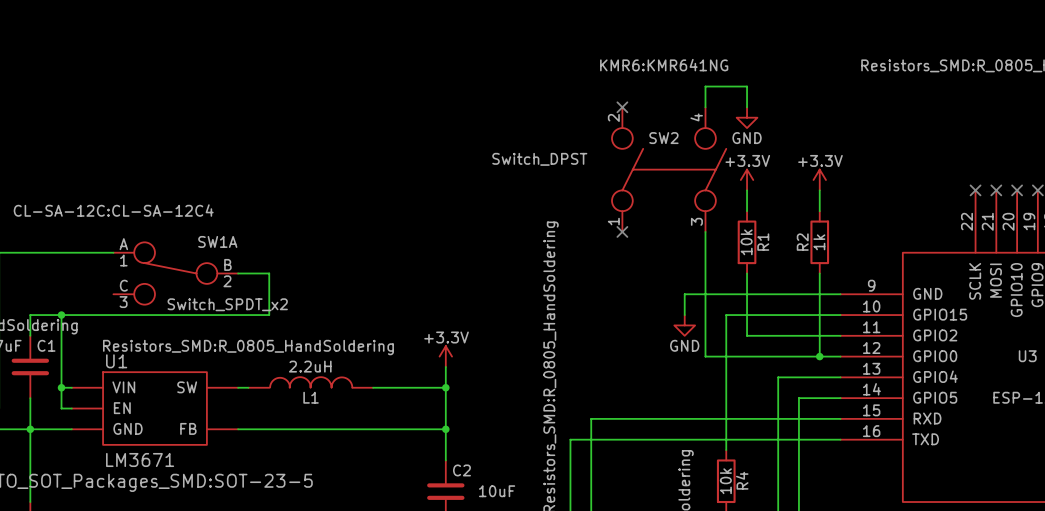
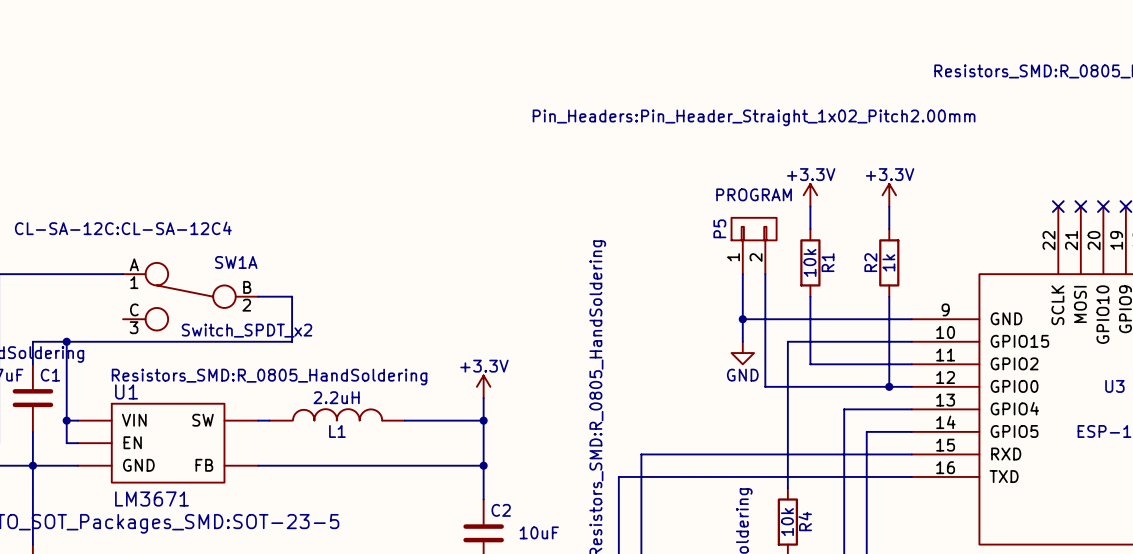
no-connect mark: (622, 107) -> none
wire: (705, 107) (705, 86) (747, 86) (747, 107) -> none
power symbol: GND (747, 117) -> none
SW2: Switch_DPST (669, 169) -> none
P5: none -> PROGRAM (754, 245)
no-connect mark: (622, 231) -> none
wire: none -> (742, 274) (742, 319)
junction: none -> (742, 319)

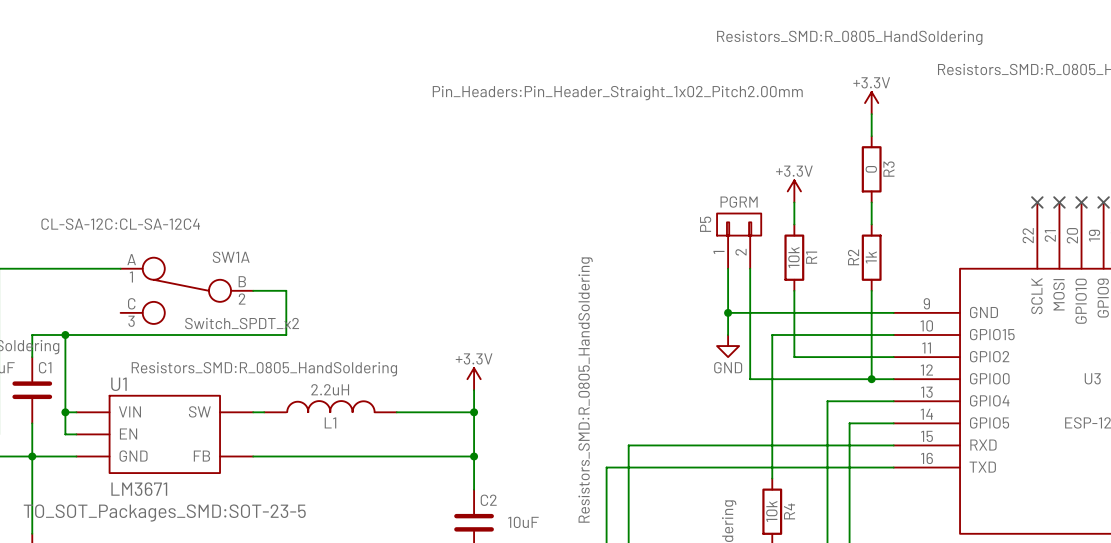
wire: none -> (871, 114) (871, 136)
P5 text position: Pin_Headers:Pin_Header_Straight_1x02_Pitch2.00mm (754, 117) -> Pin_Headers:Pin_Header_Straight_1x02_Pitch2.00mm (617, 93)
R3: none -> 0 (871, 169)
P5 value: PROGRAM (754, 194) -> PGRM (739, 202)
power symbol position: +3.3V (889, 195) -> +3.3V (871, 103)

